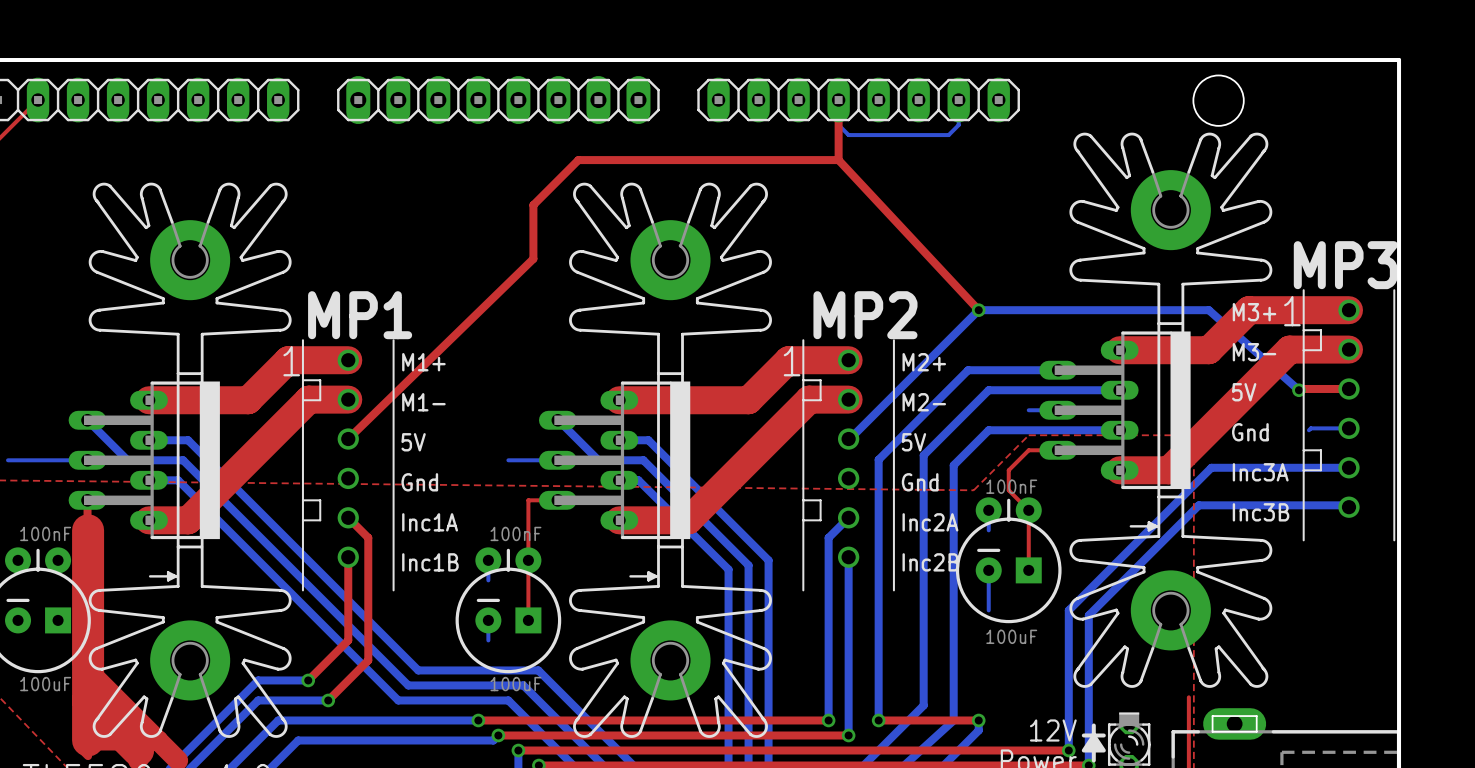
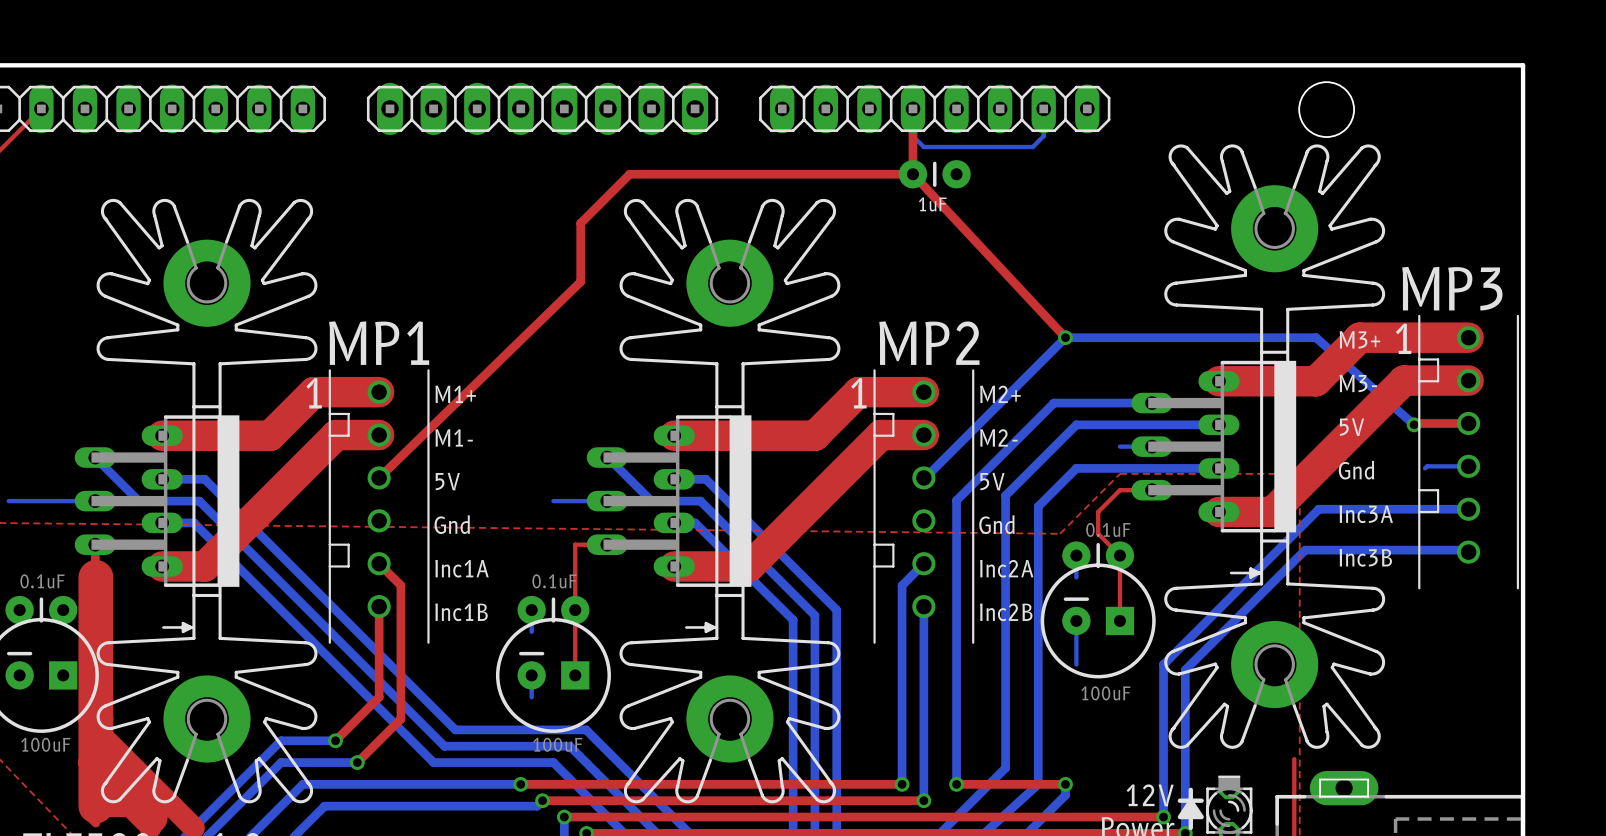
part: none -> 1uF (934, 174)
part value: 100nF (1011, 486) -> 0.1uF (1108, 529)
part value: 100nF (45, 533) -> 0.1uF (42, 581)
part value: 100nF (515, 533) -> 0.1uF (554, 581)

